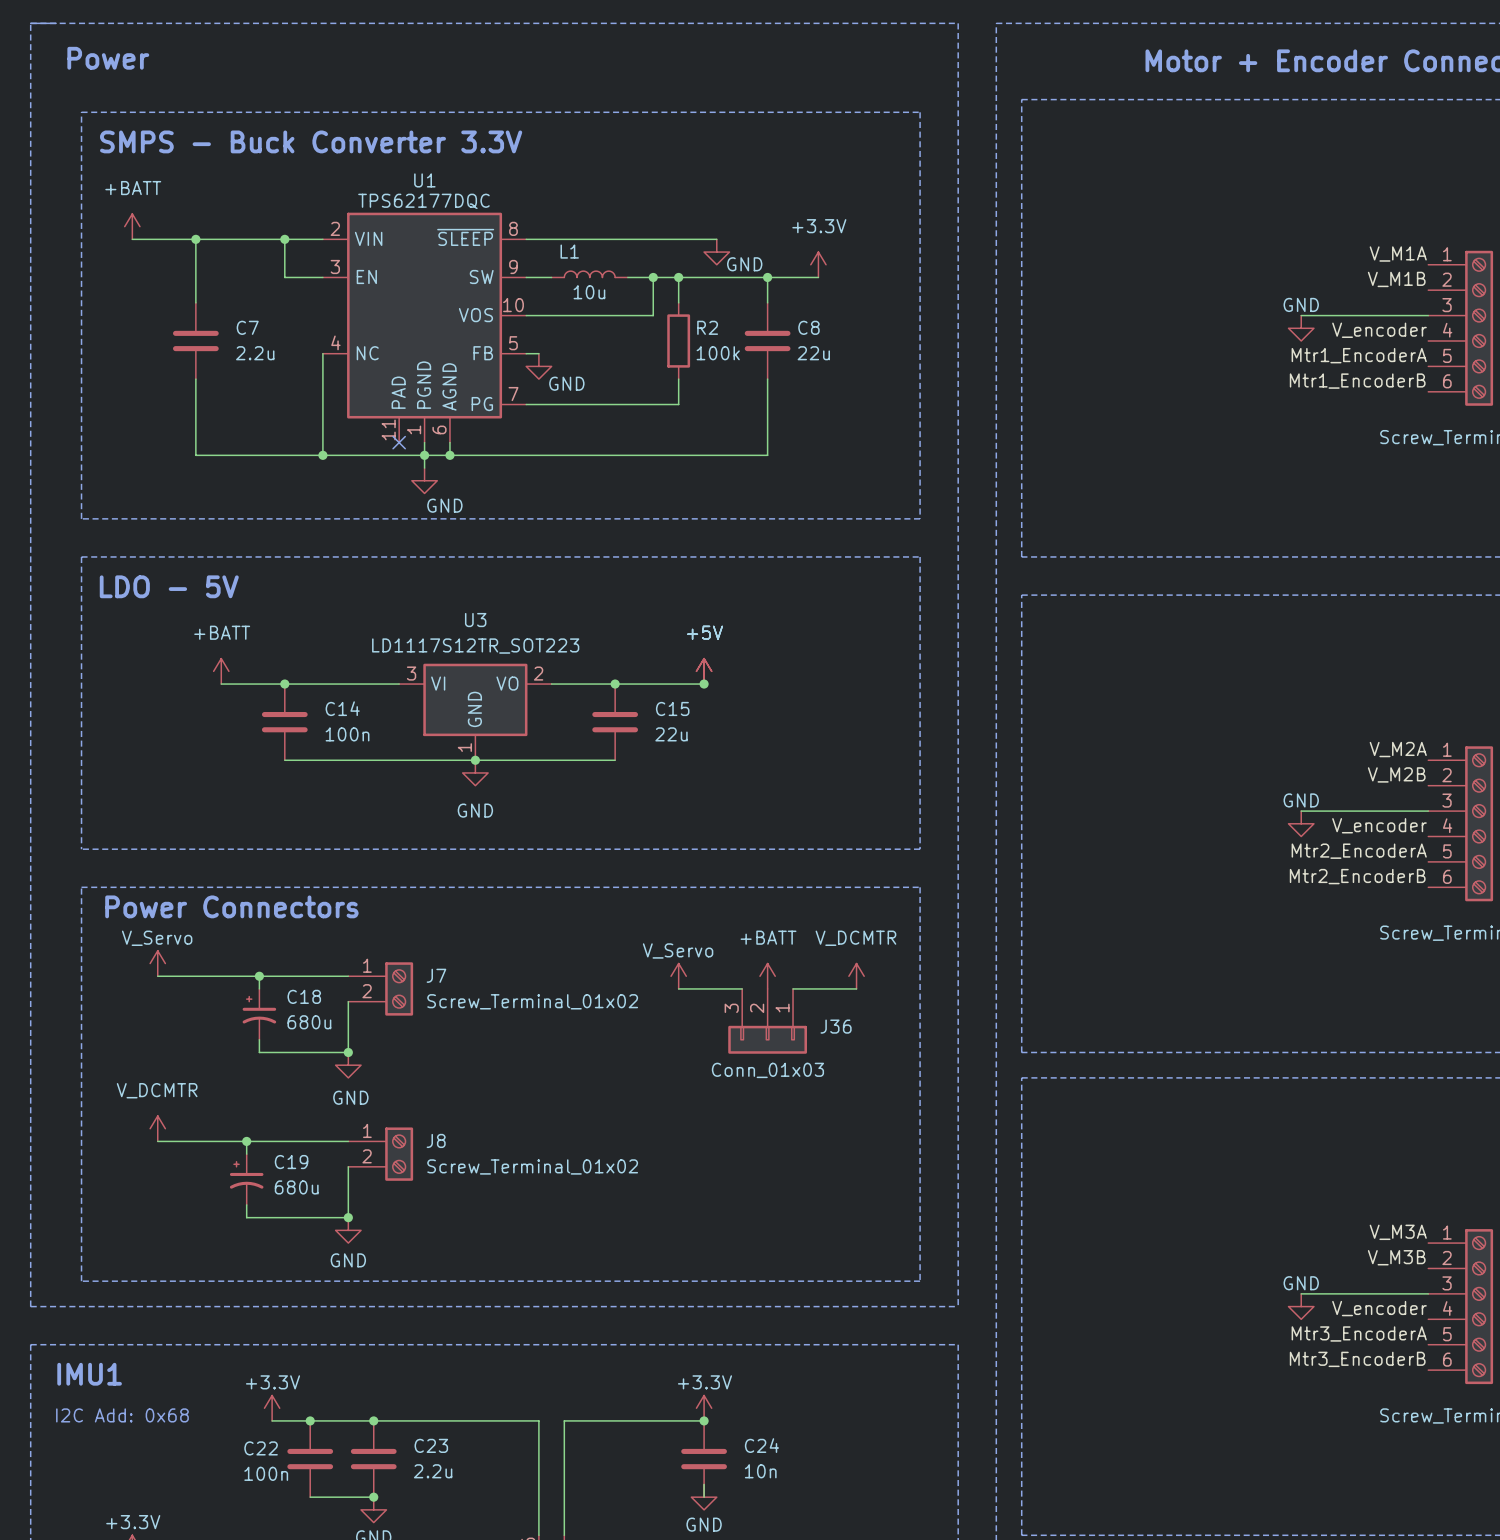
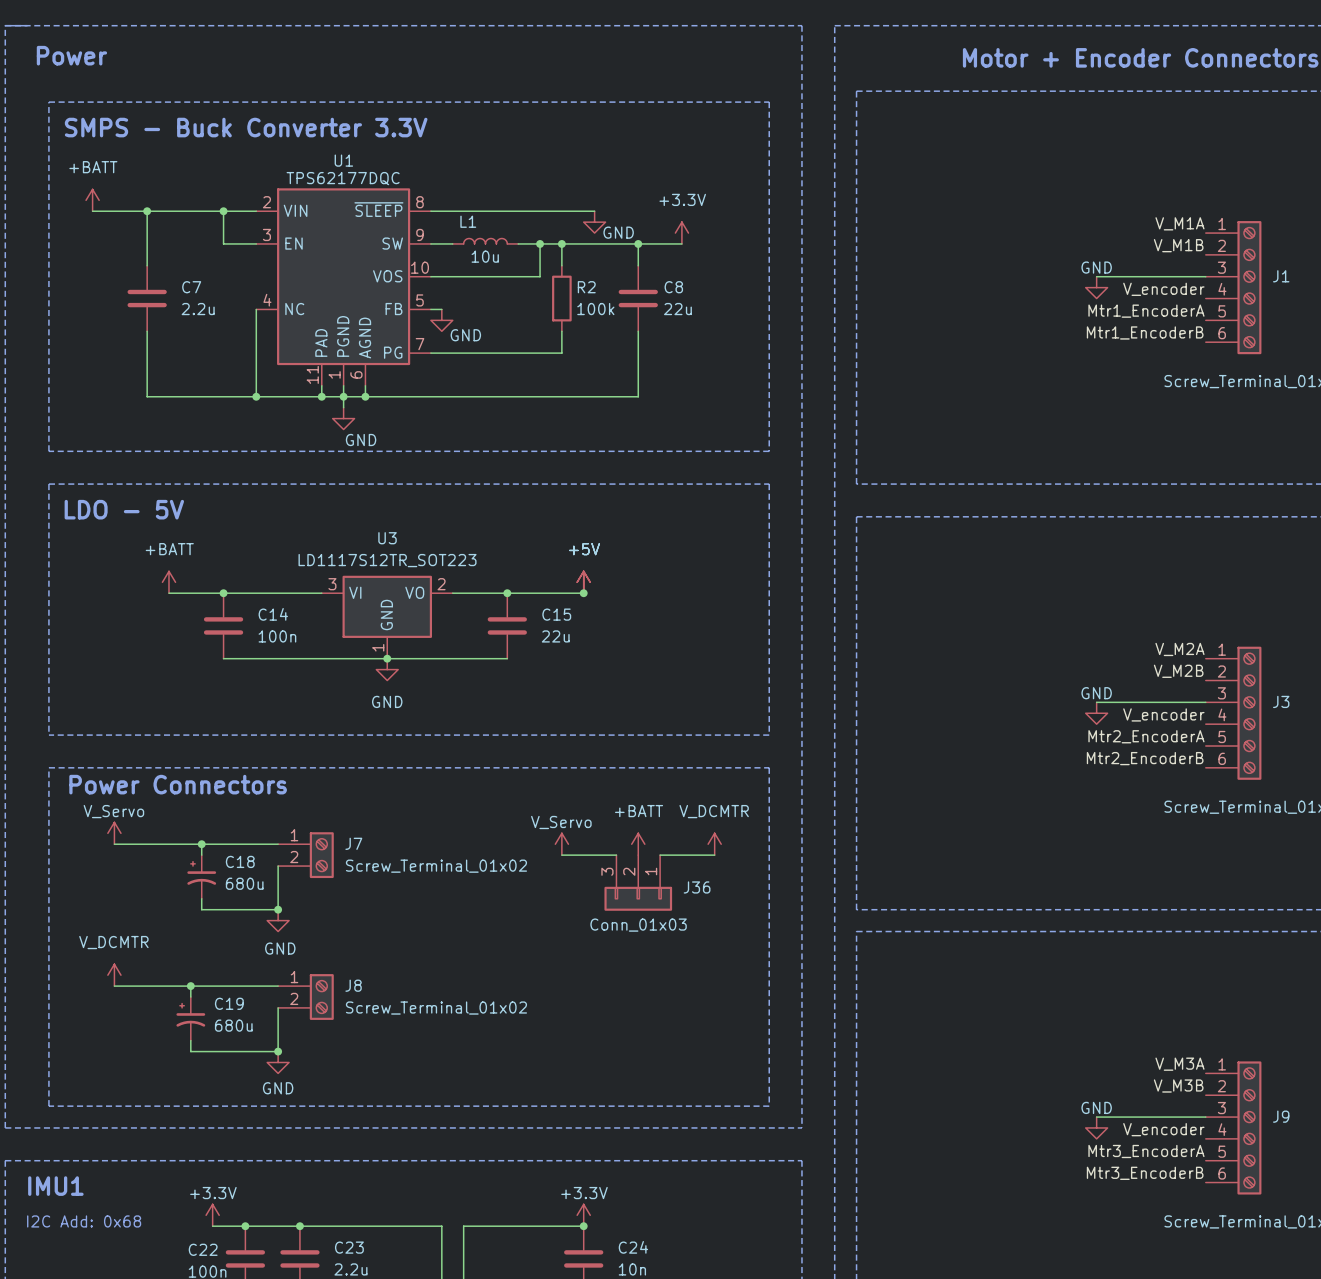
wire: none -> (321, 385) (321, 396)
no-connect mark: (399, 442) -> none
junction: none -> (321, 396)

